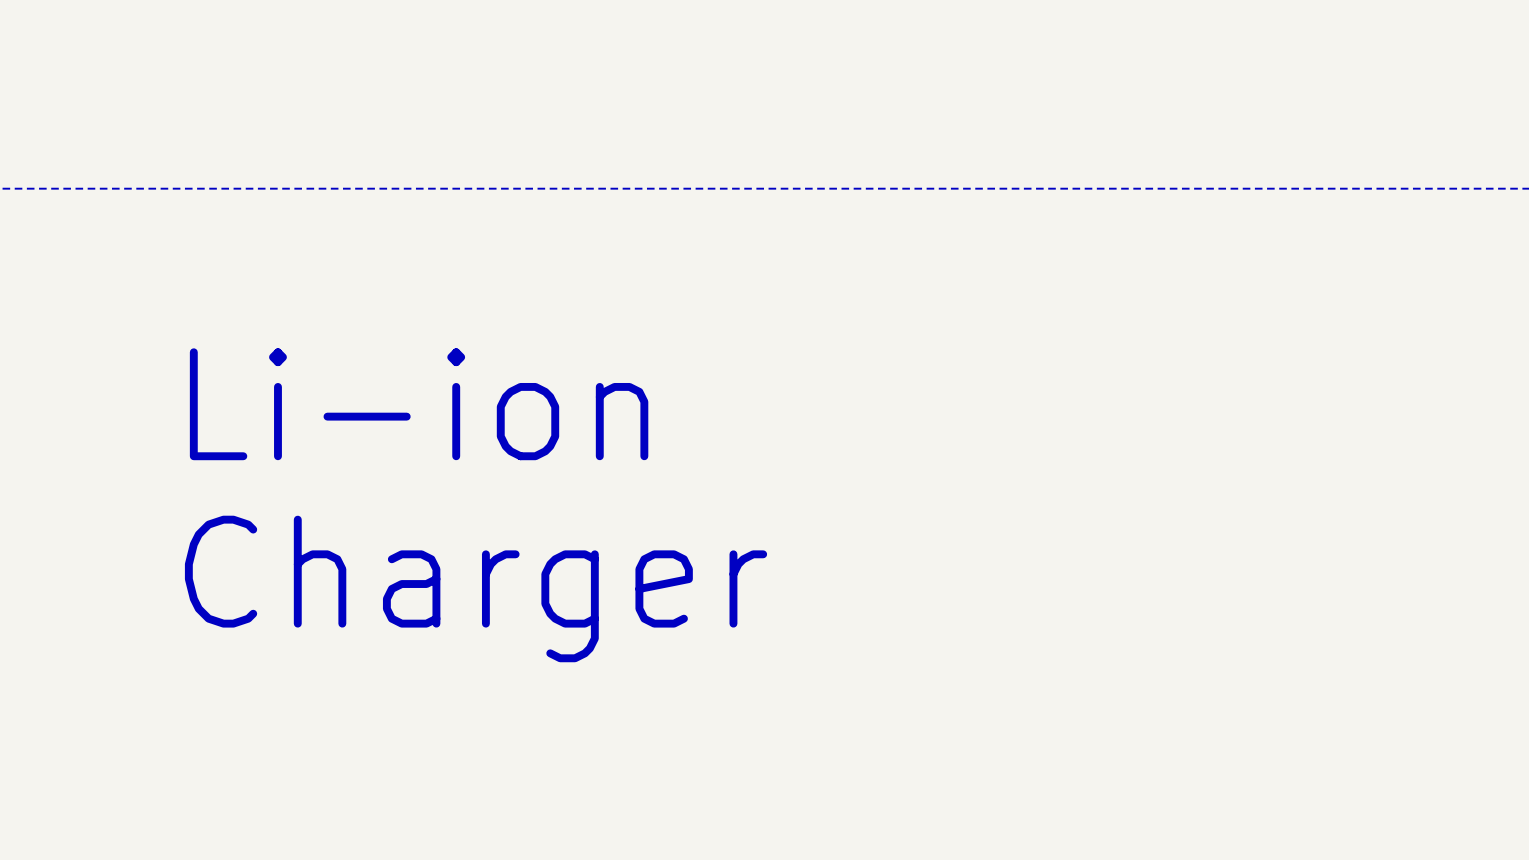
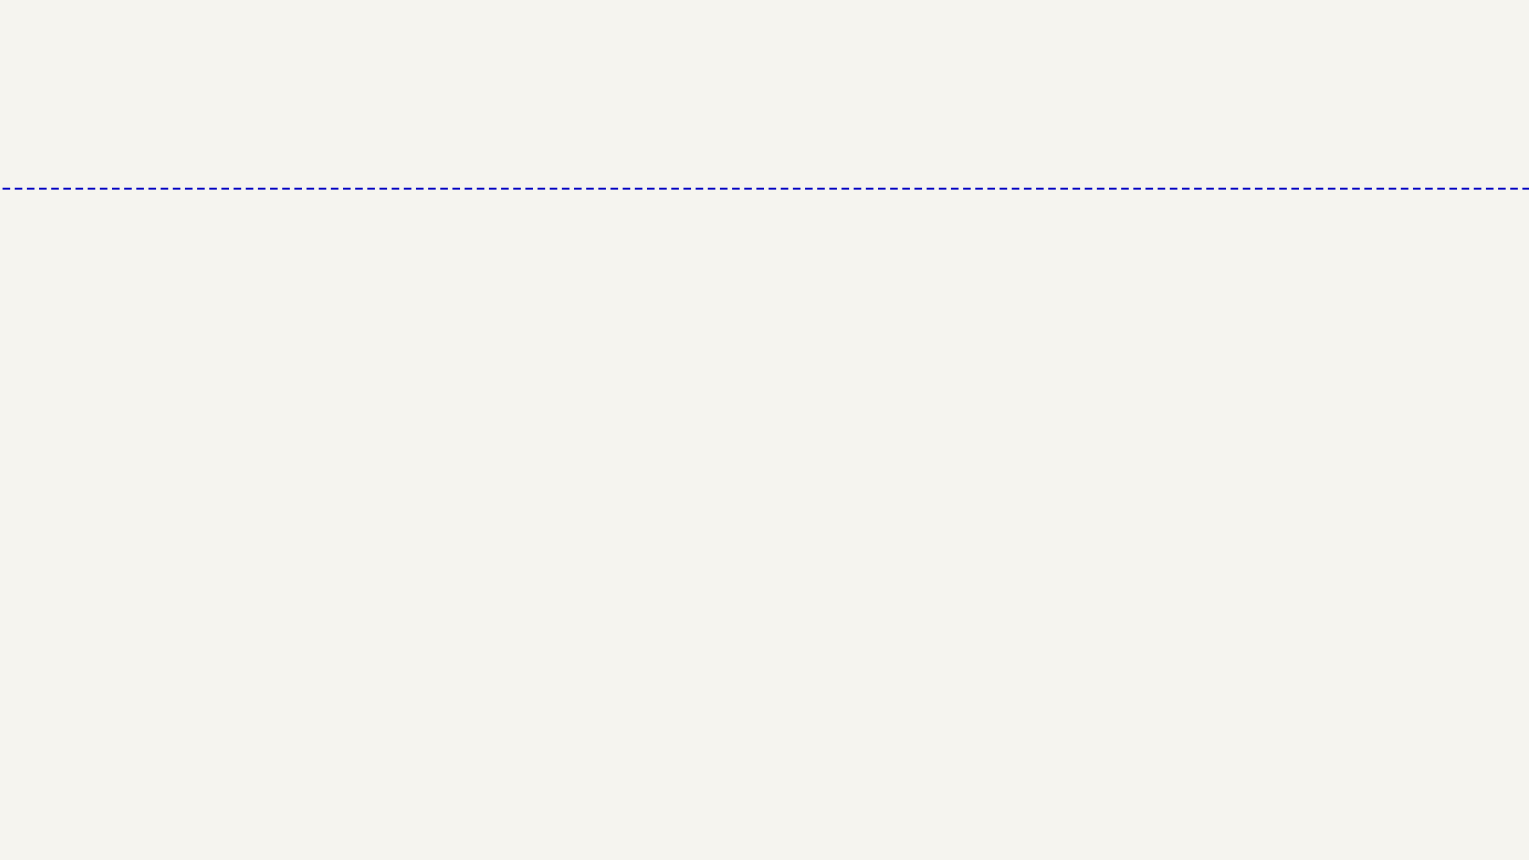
text: Li-ion (419, 404) -> none
text: Charger (476, 588) -> none

